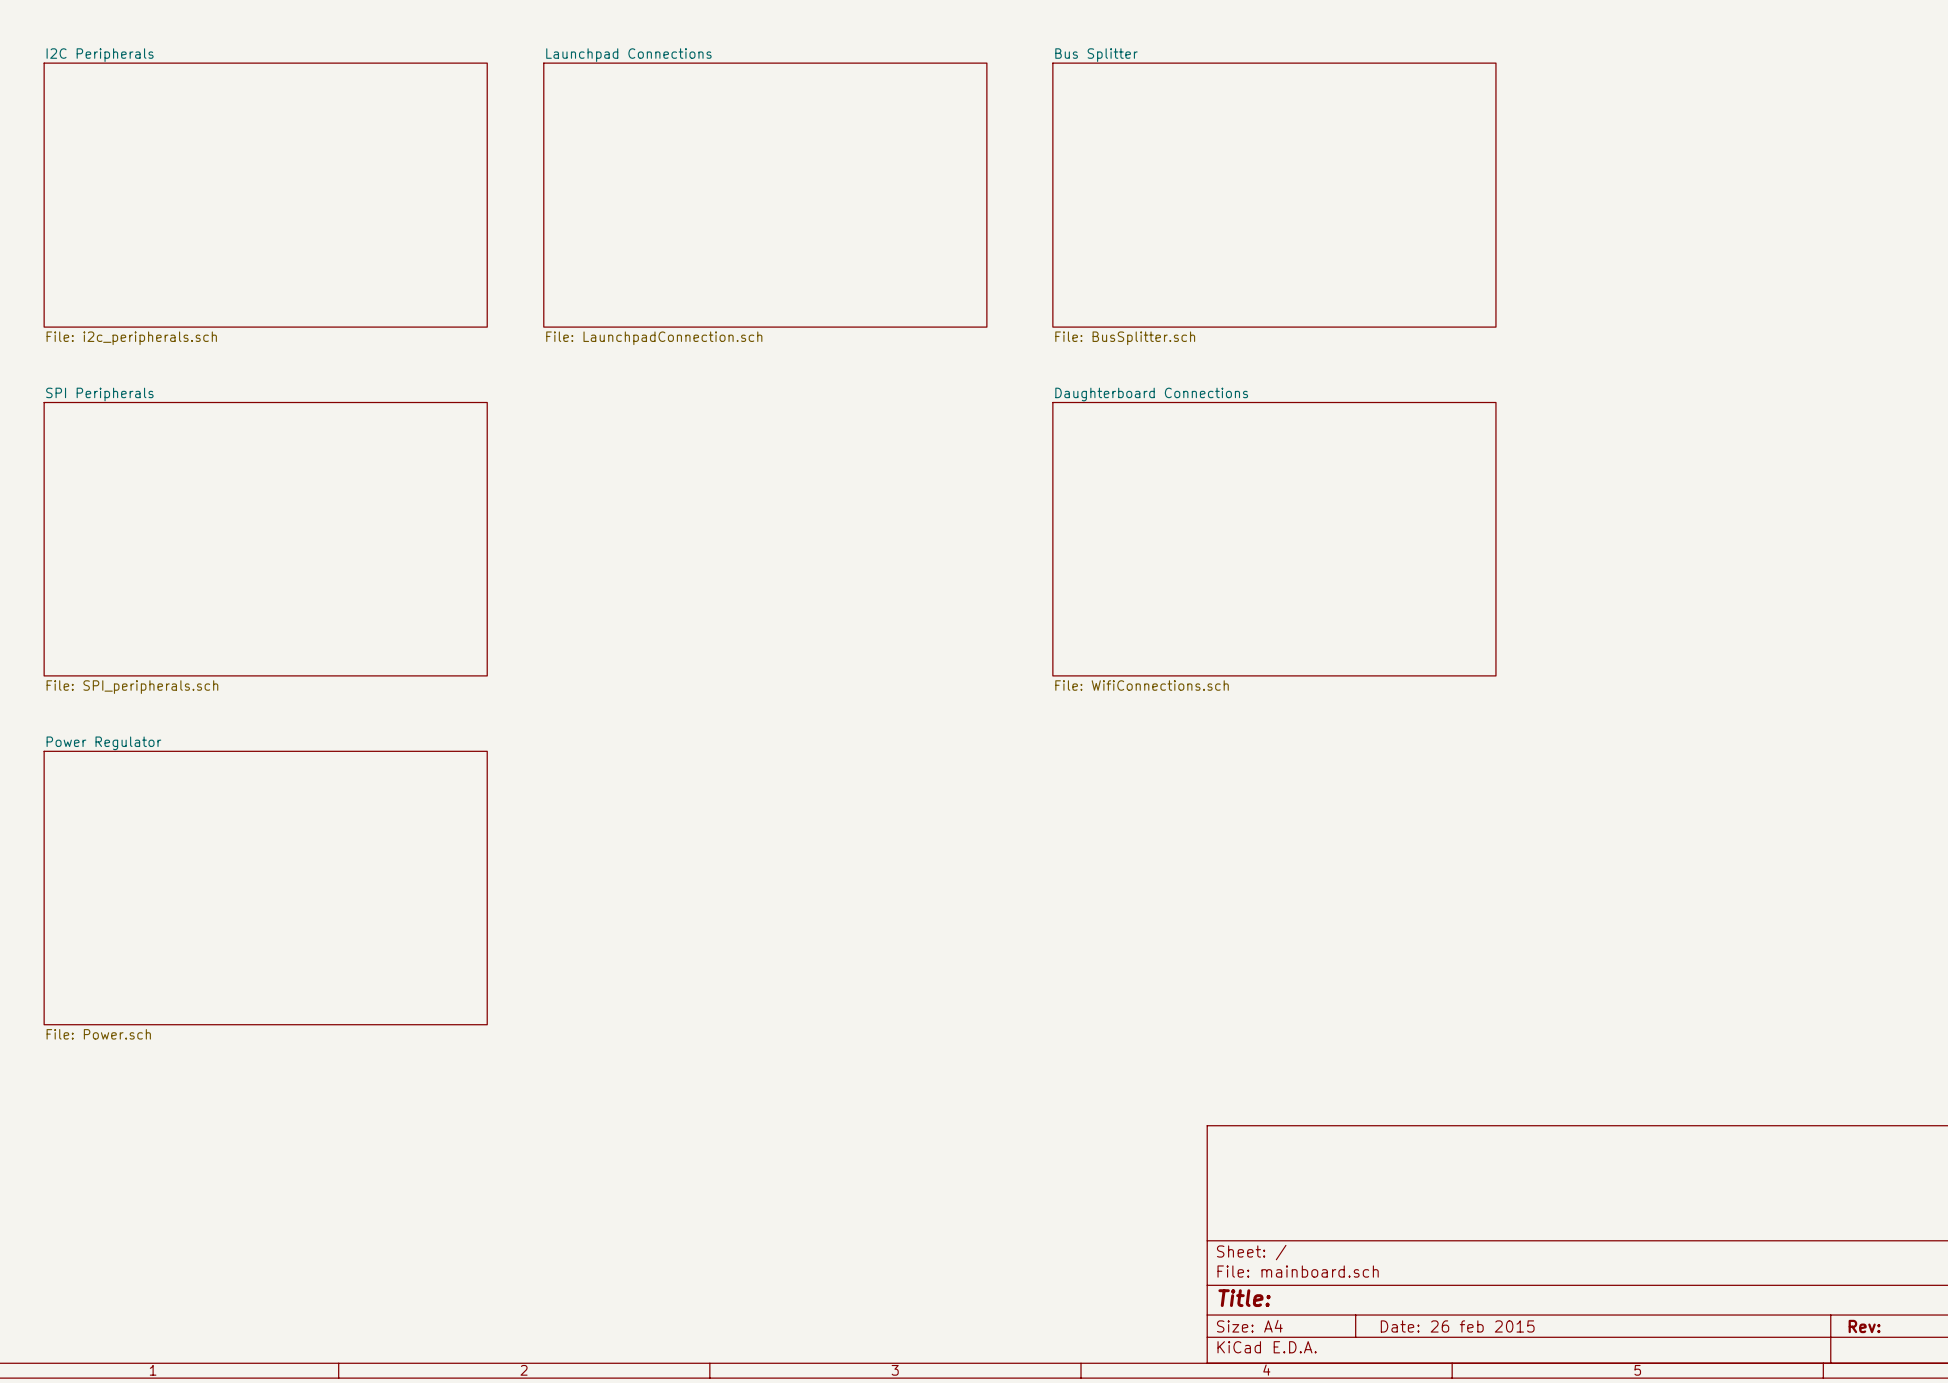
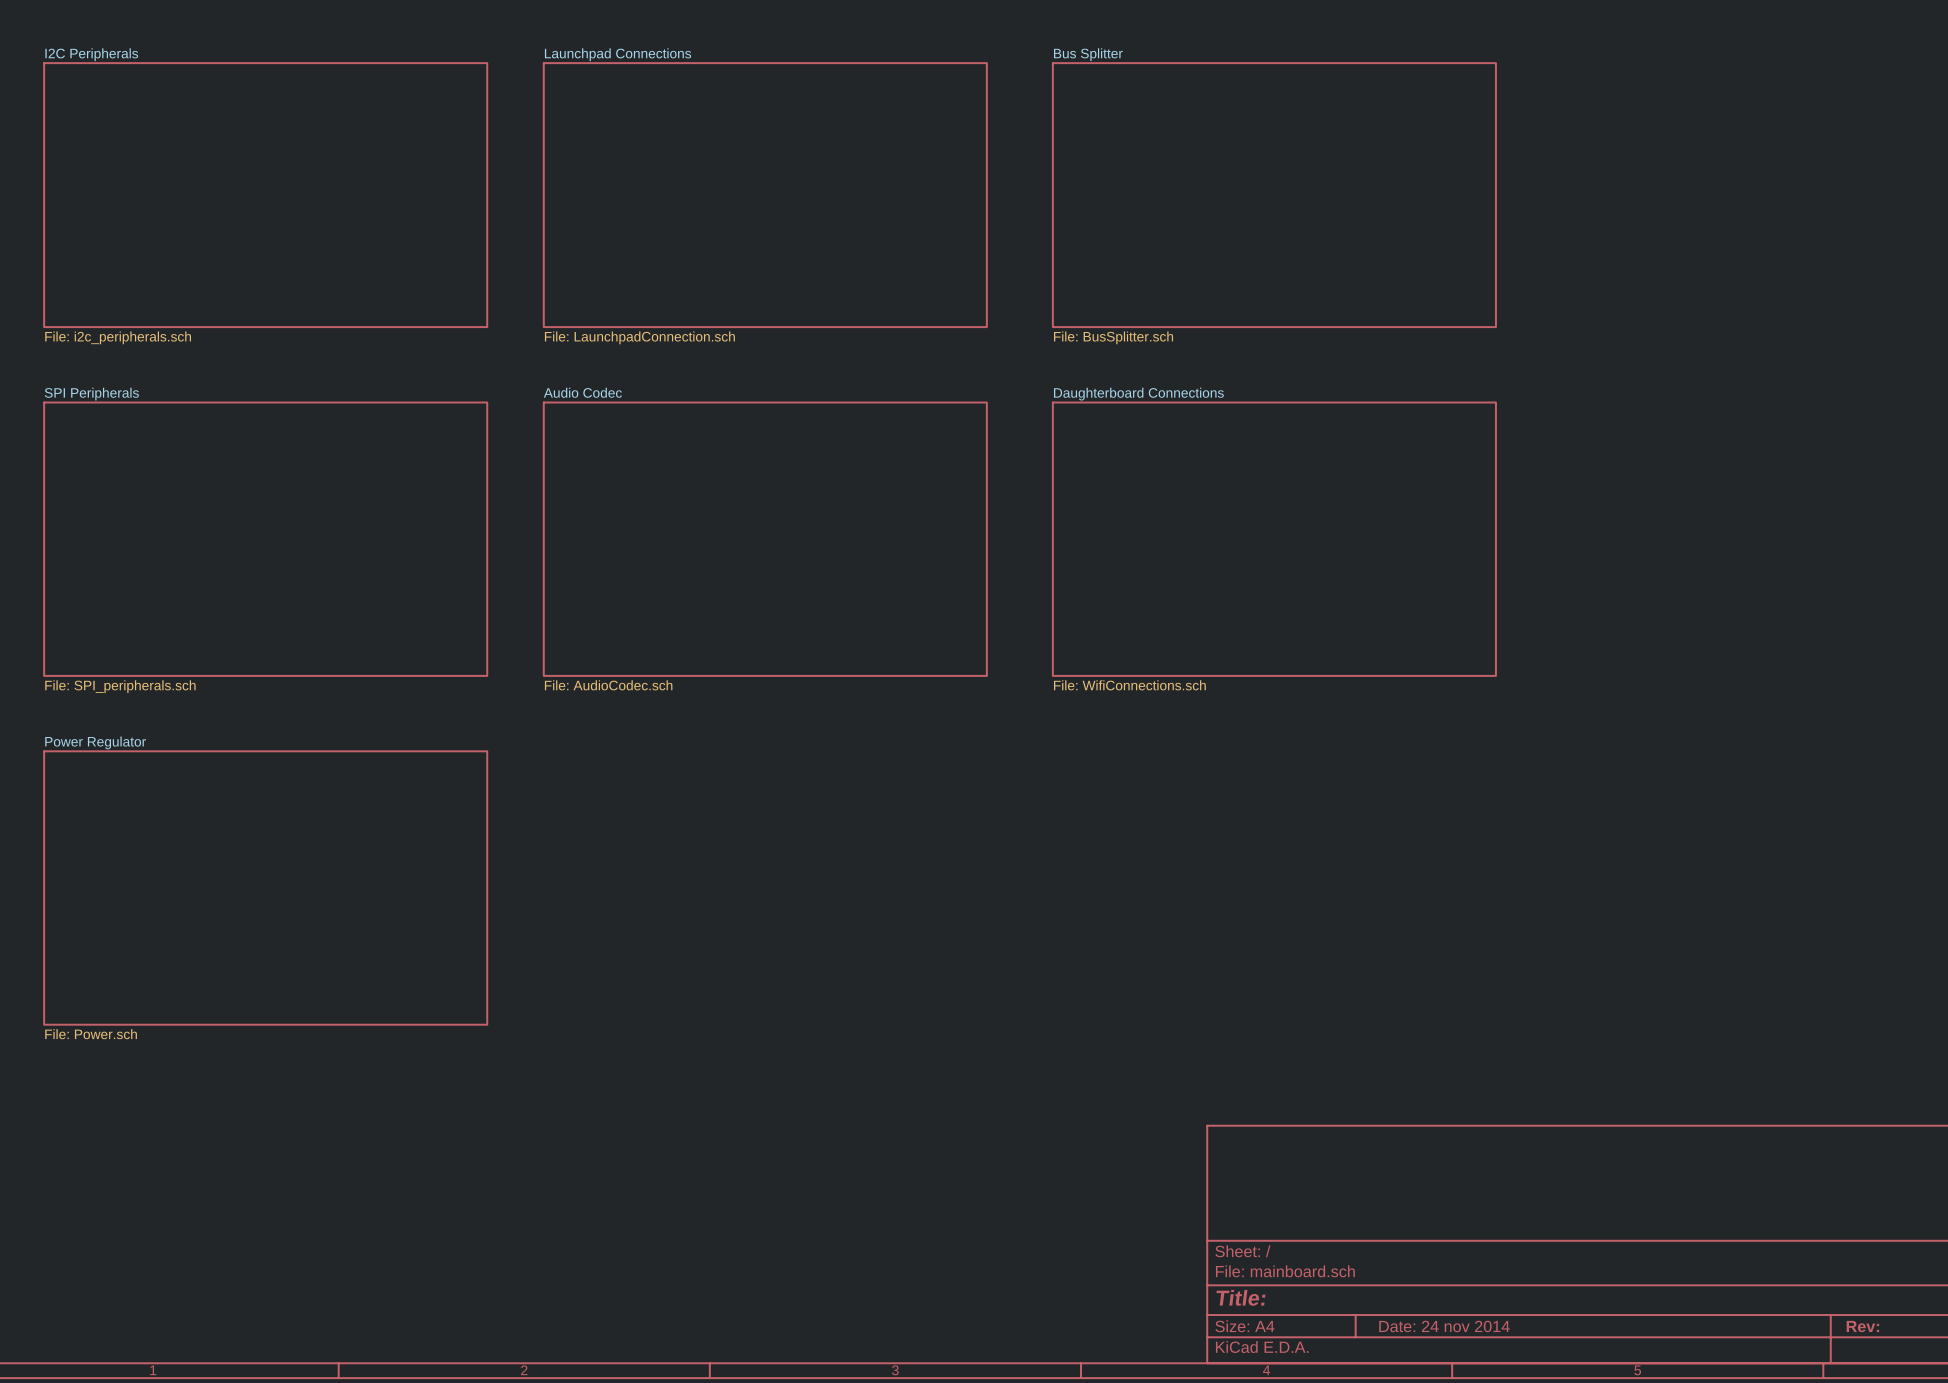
sheet Audio Codec: none -> File: AudioCodec.sch (765, 539)
title block: Date: 26 feb 2015 (1457, 1326) -> Date: 24 nov 2014 (1444, 1326)

